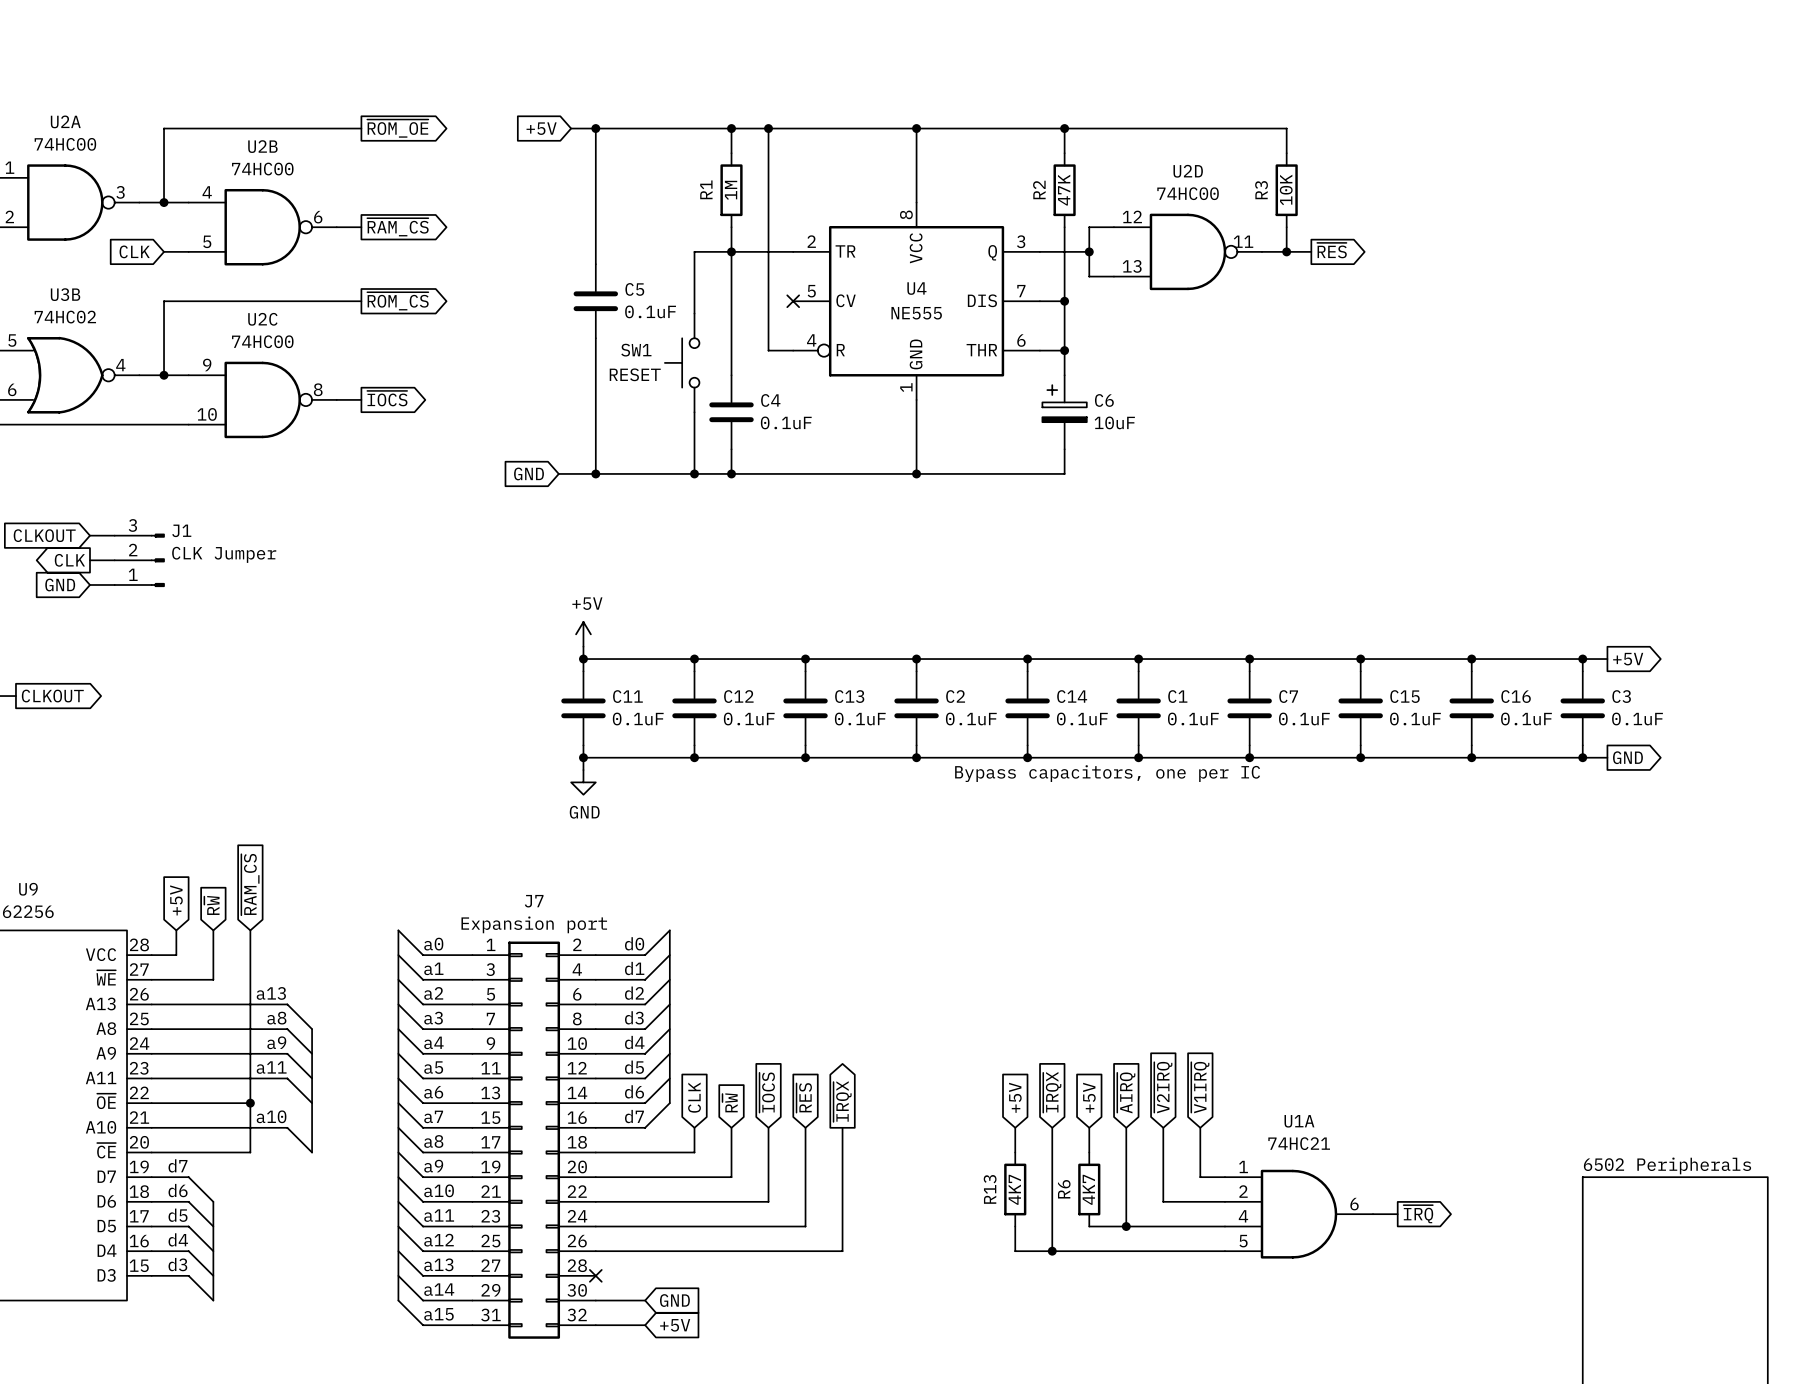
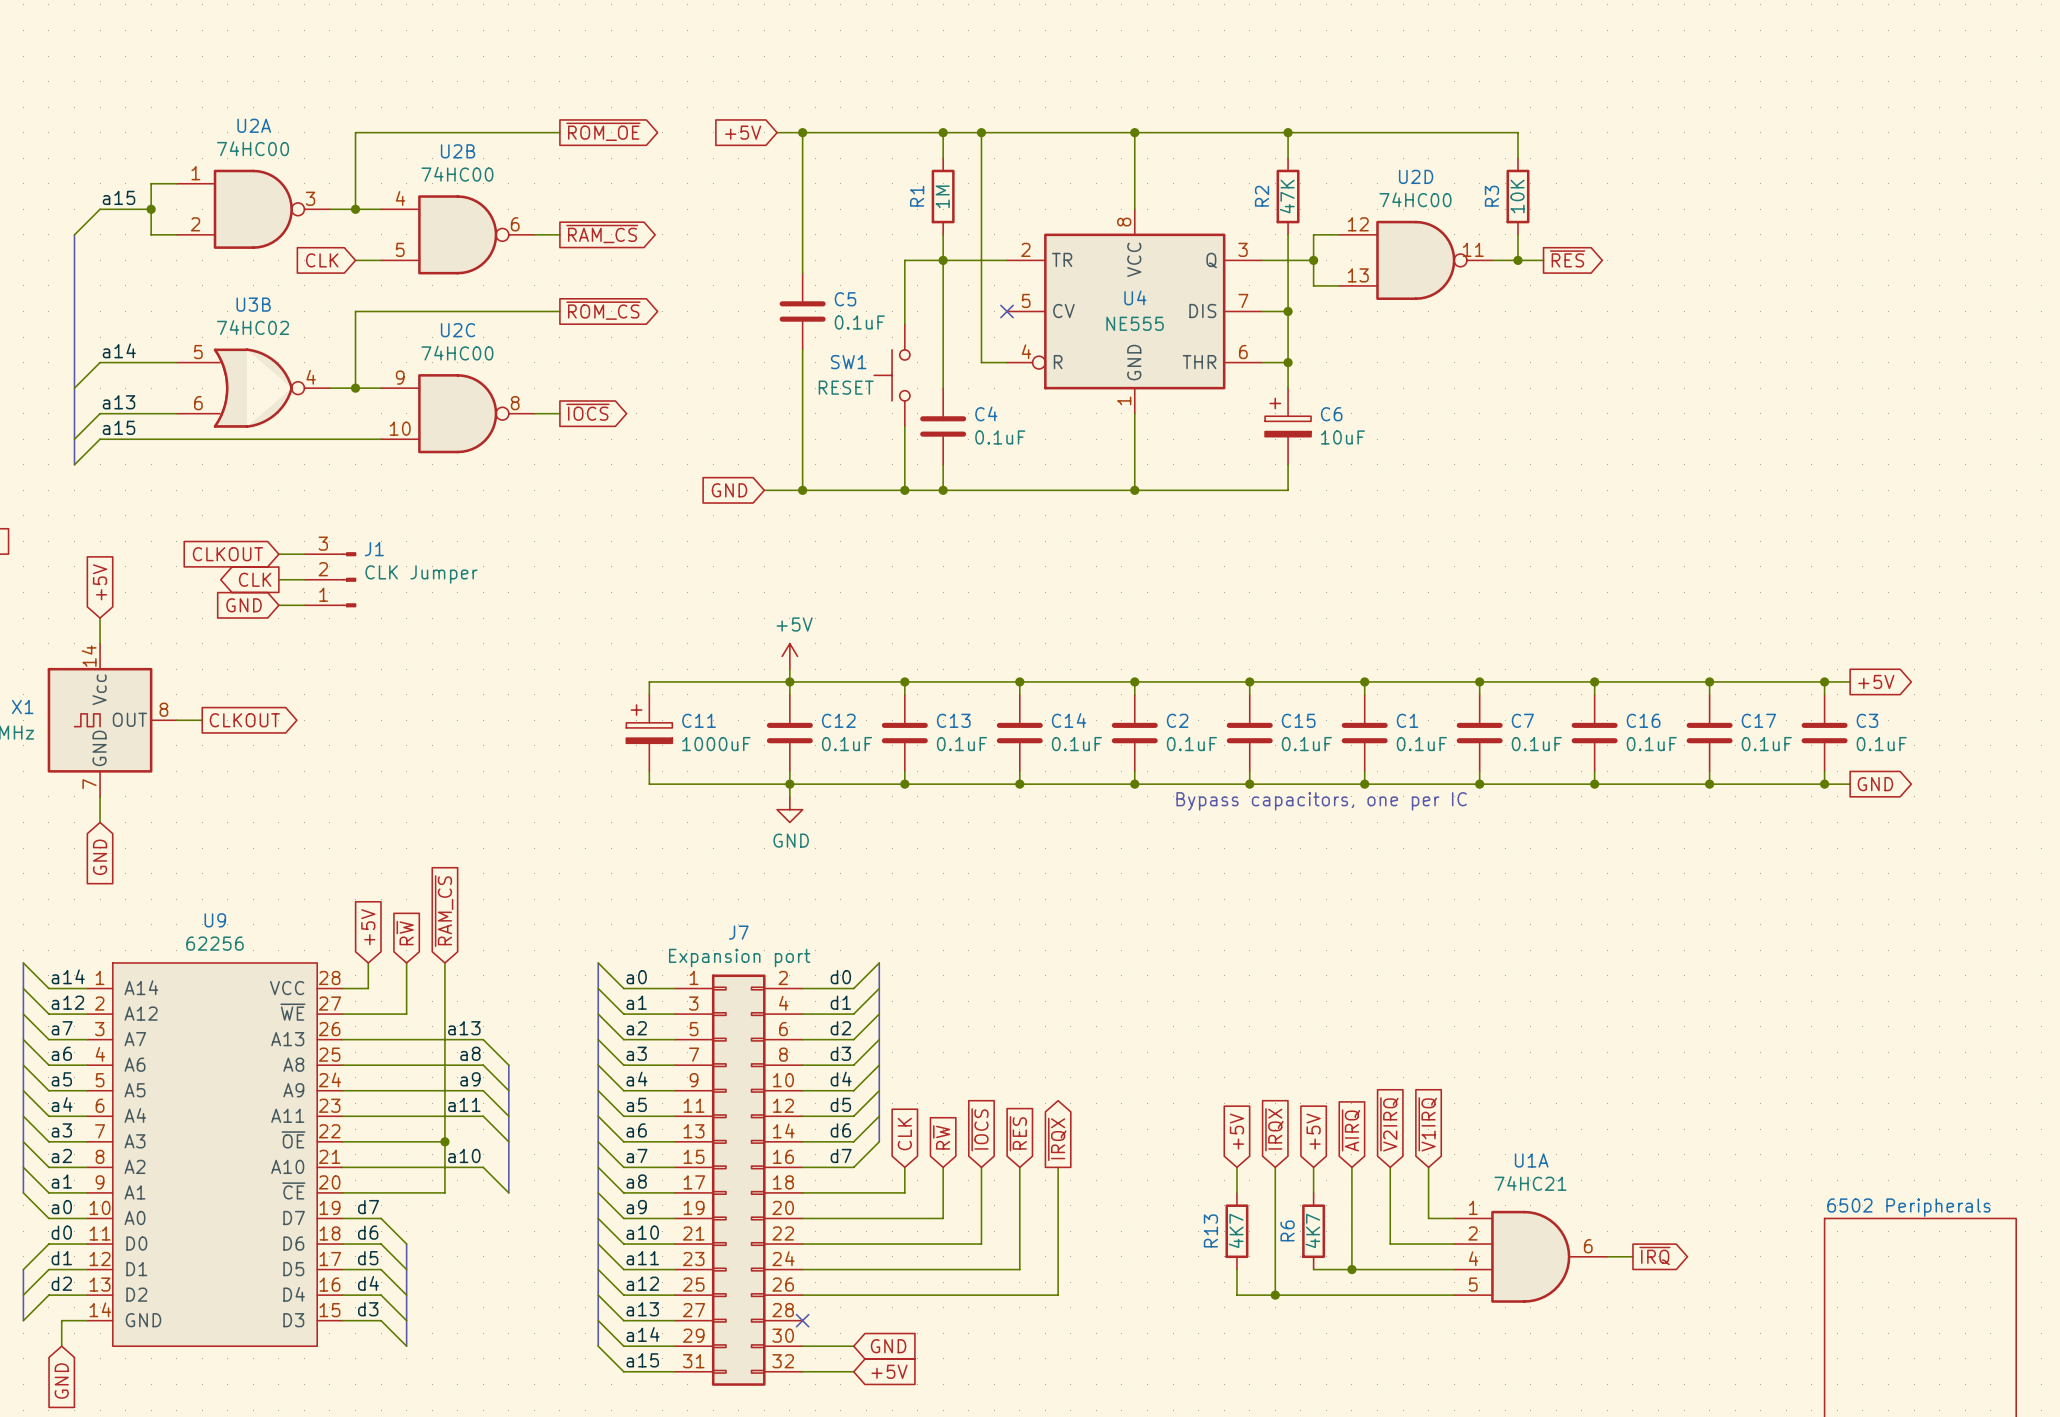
wire: none -> (789, 681) (649, 681) (649, 694)
C11 name: C11 (627, 696) -> C12 (838, 720)
C12 name: C12 (738, 696) -> C13 (953, 720)
C13 name: C13 (849, 696) -> C14 (1069, 720)
C14 name: C14 (1072, 696) -> C15 (1298, 720)
C15 name: C15 (1405, 696) -> C16 (1643, 720)
C16 name: C16 (1516, 696) -> C17 (1758, 720)
C11: none -> 1000uF (649, 733)
wire: none -> (649, 771) (649, 784) (789, 784)

